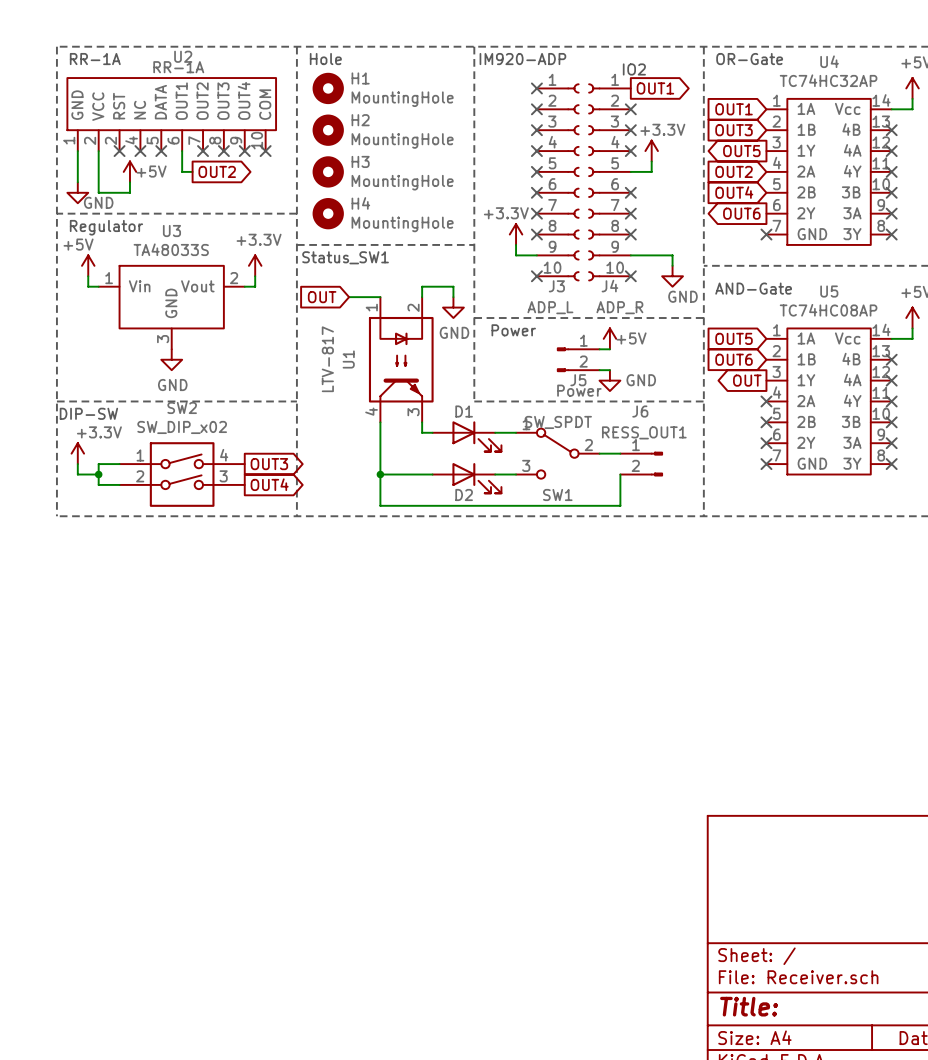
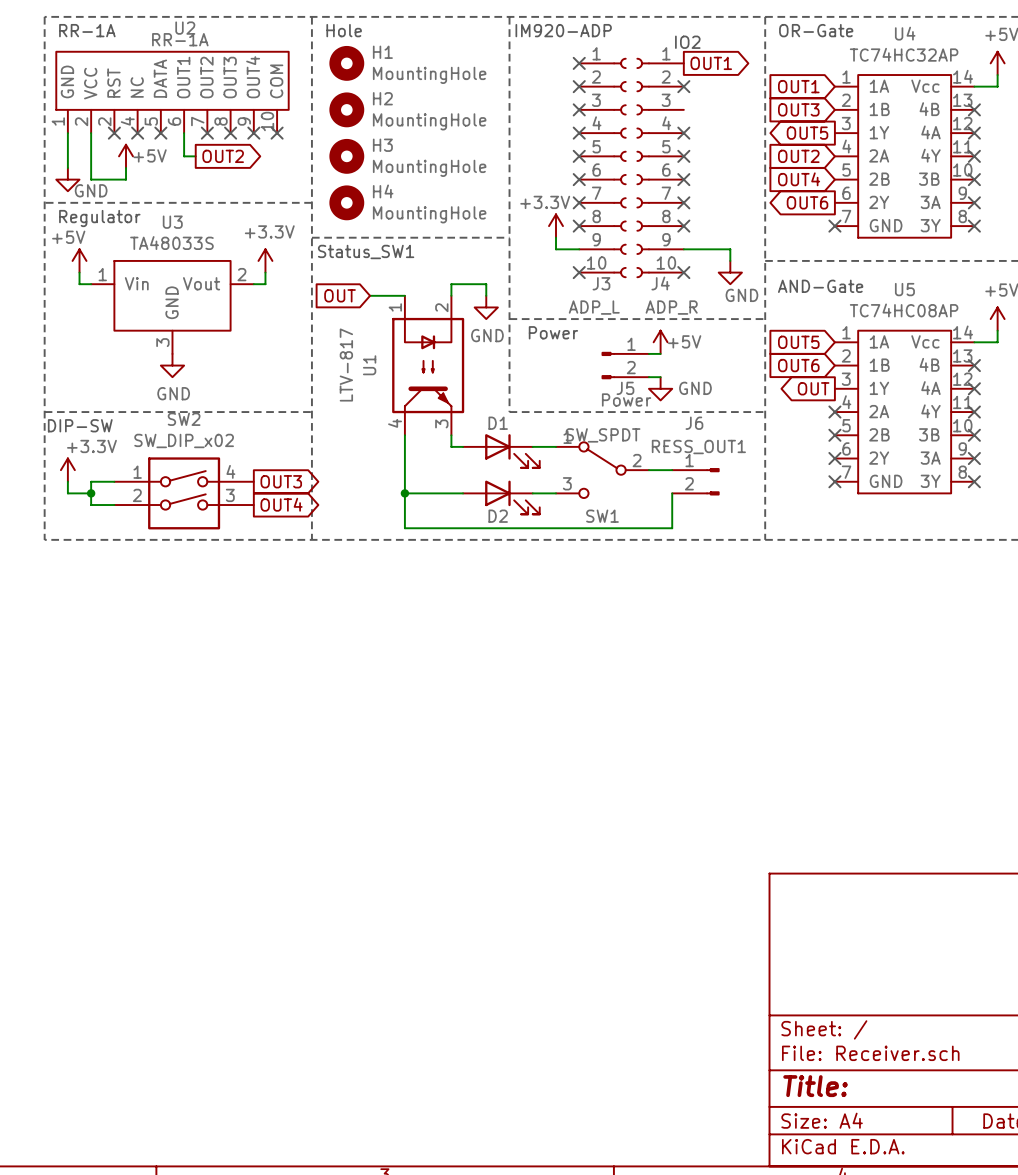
no-connect mark position: (630, 130) -> (683, 156)
power symbol: +3.3V (651, 151) -> none
wire: (651, 161) (651, 171) (630, 171) -> none

